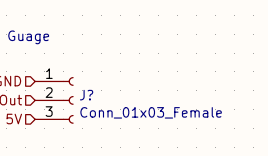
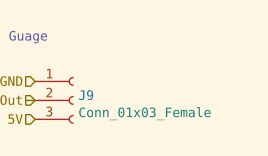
J? name: J? (86, 95) -> J9 (86, 95)
wire: none -> (25, 100) (35, 100)

